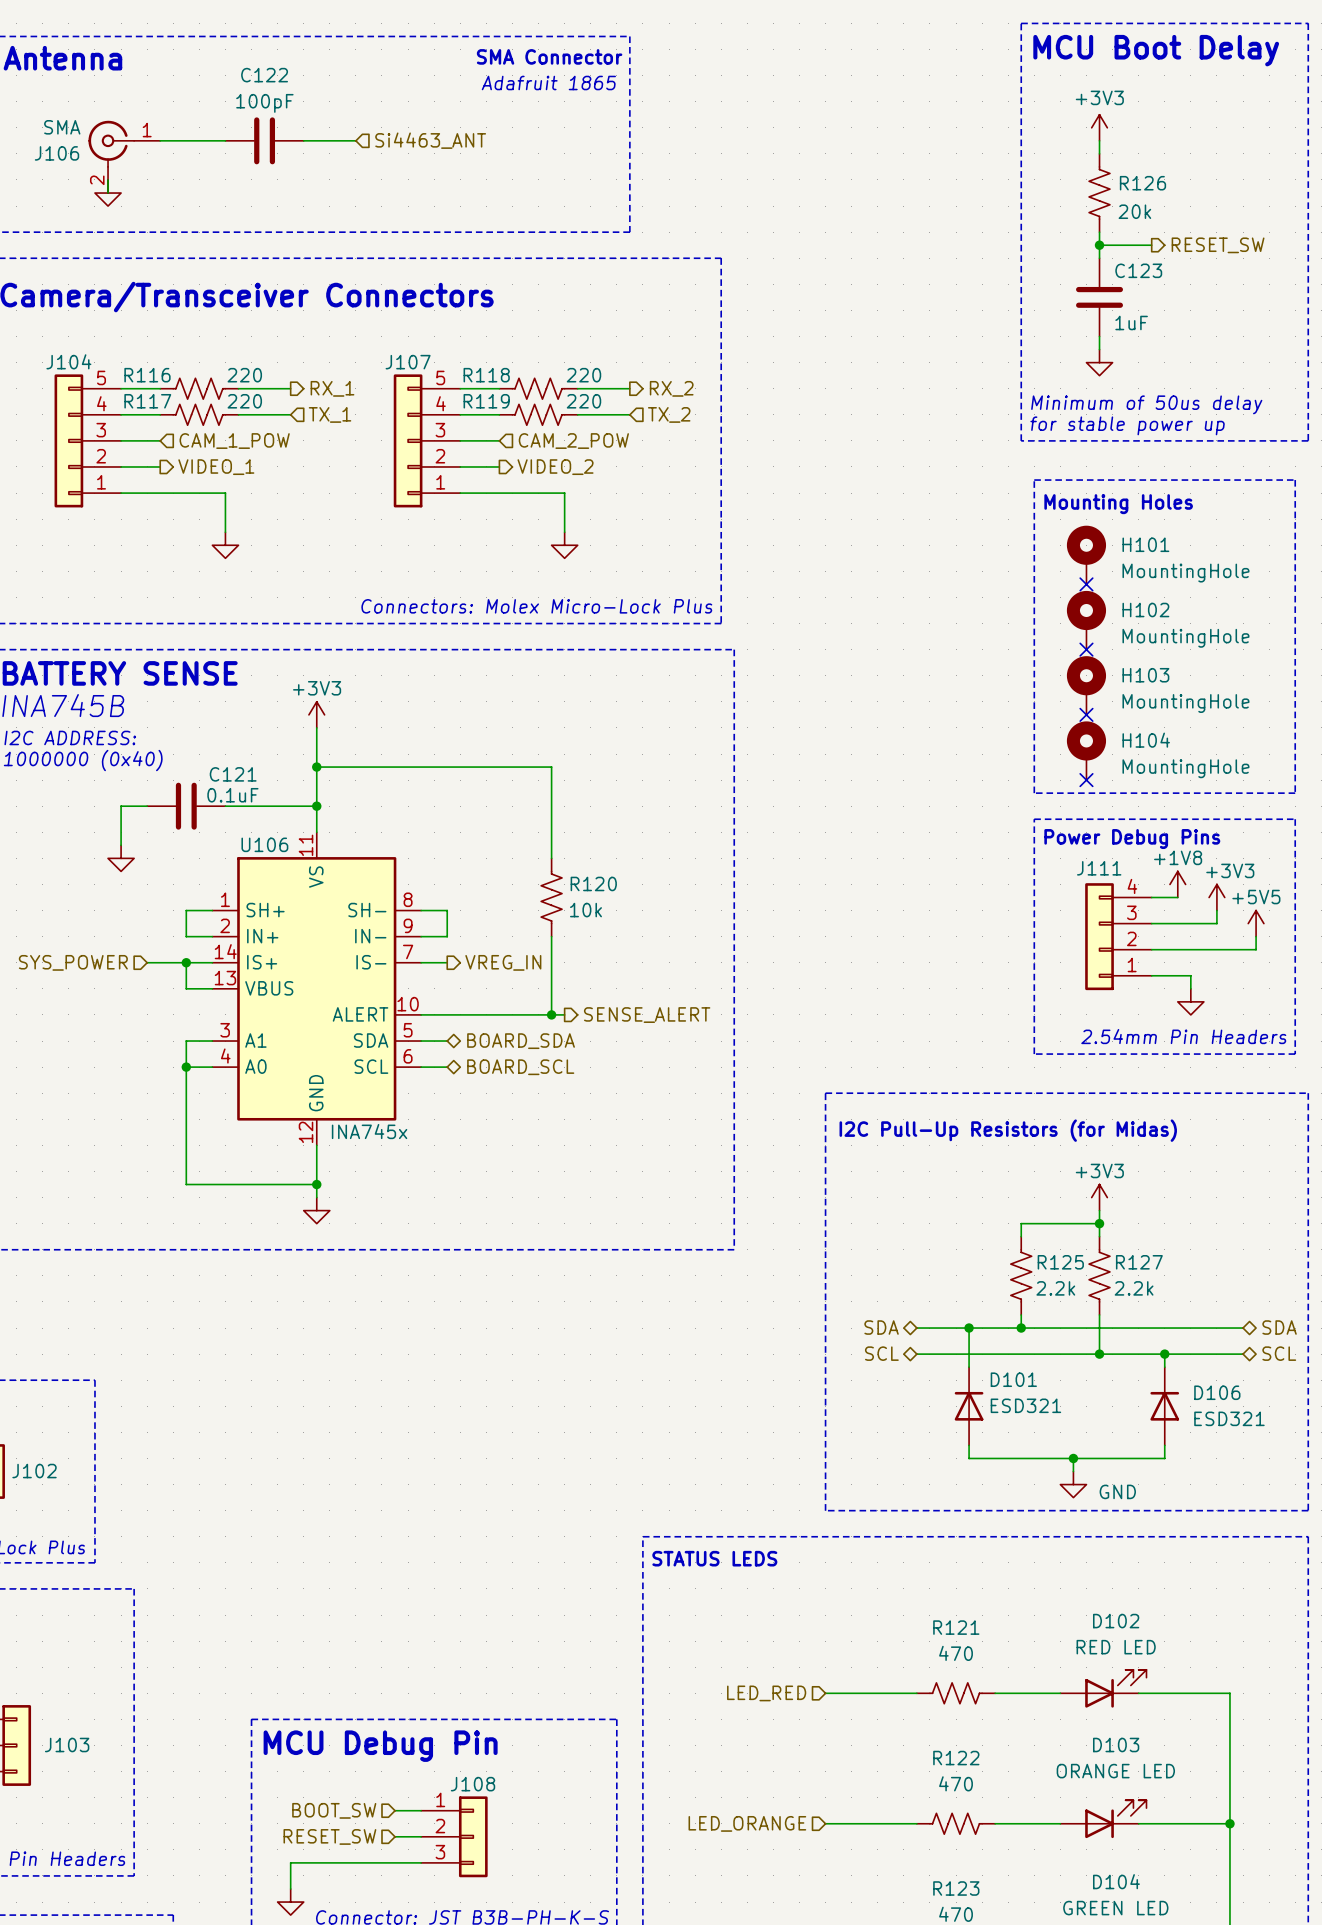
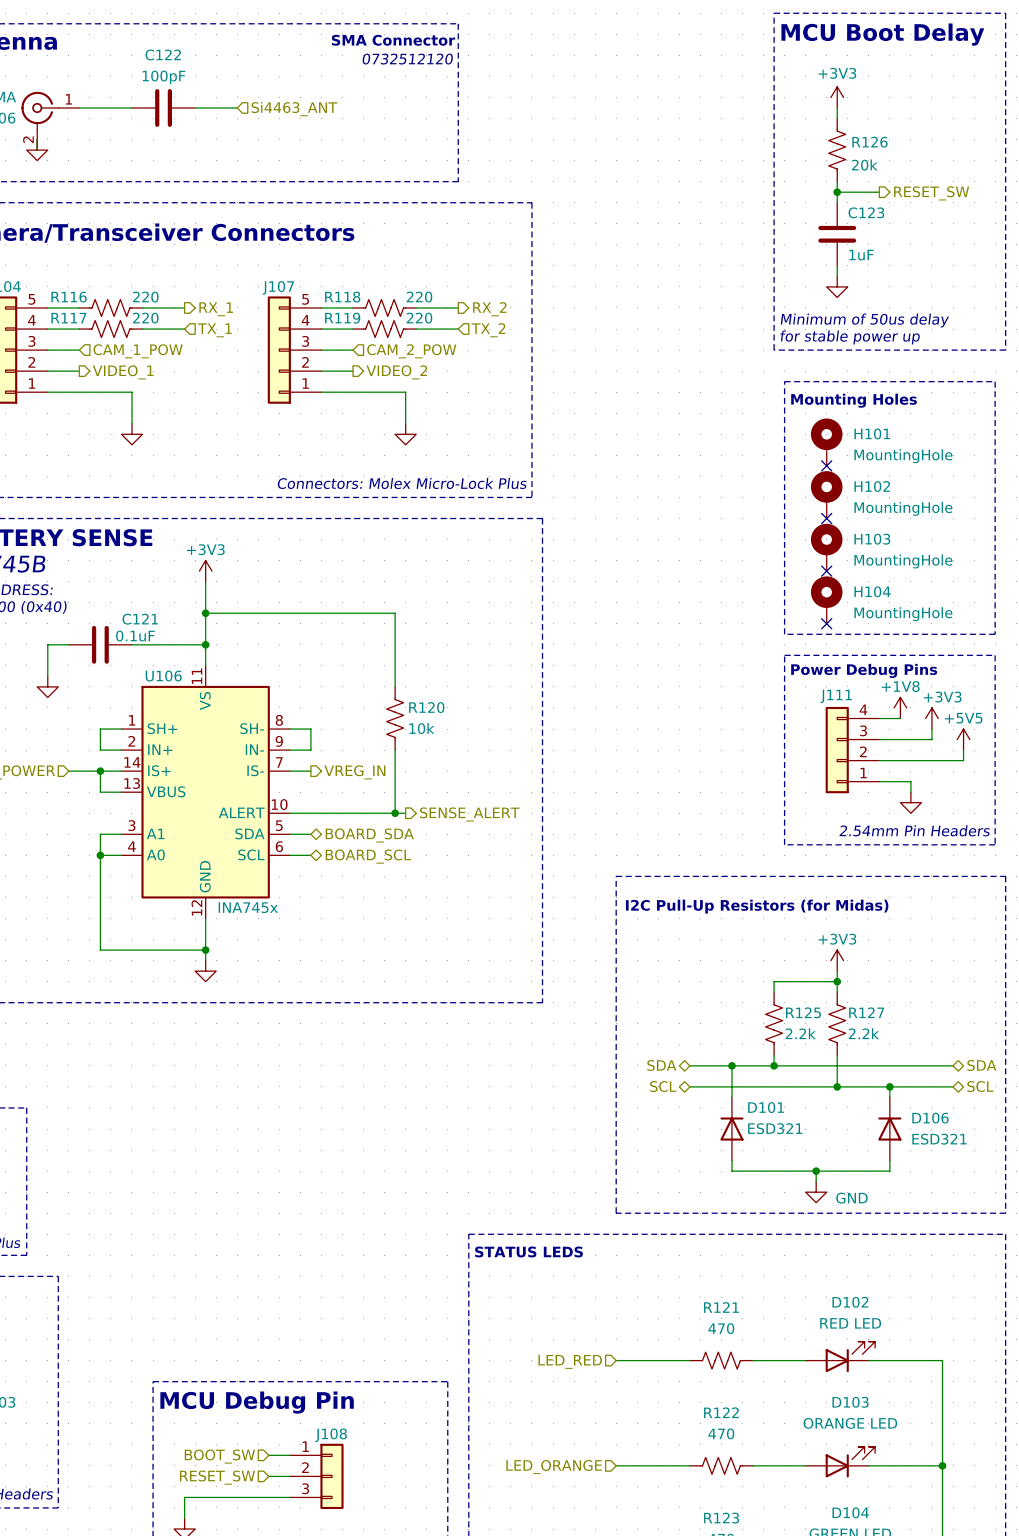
text: none -> 0732512120 (407, 59)
text: Adafruit 1865 (548, 82) -> none

